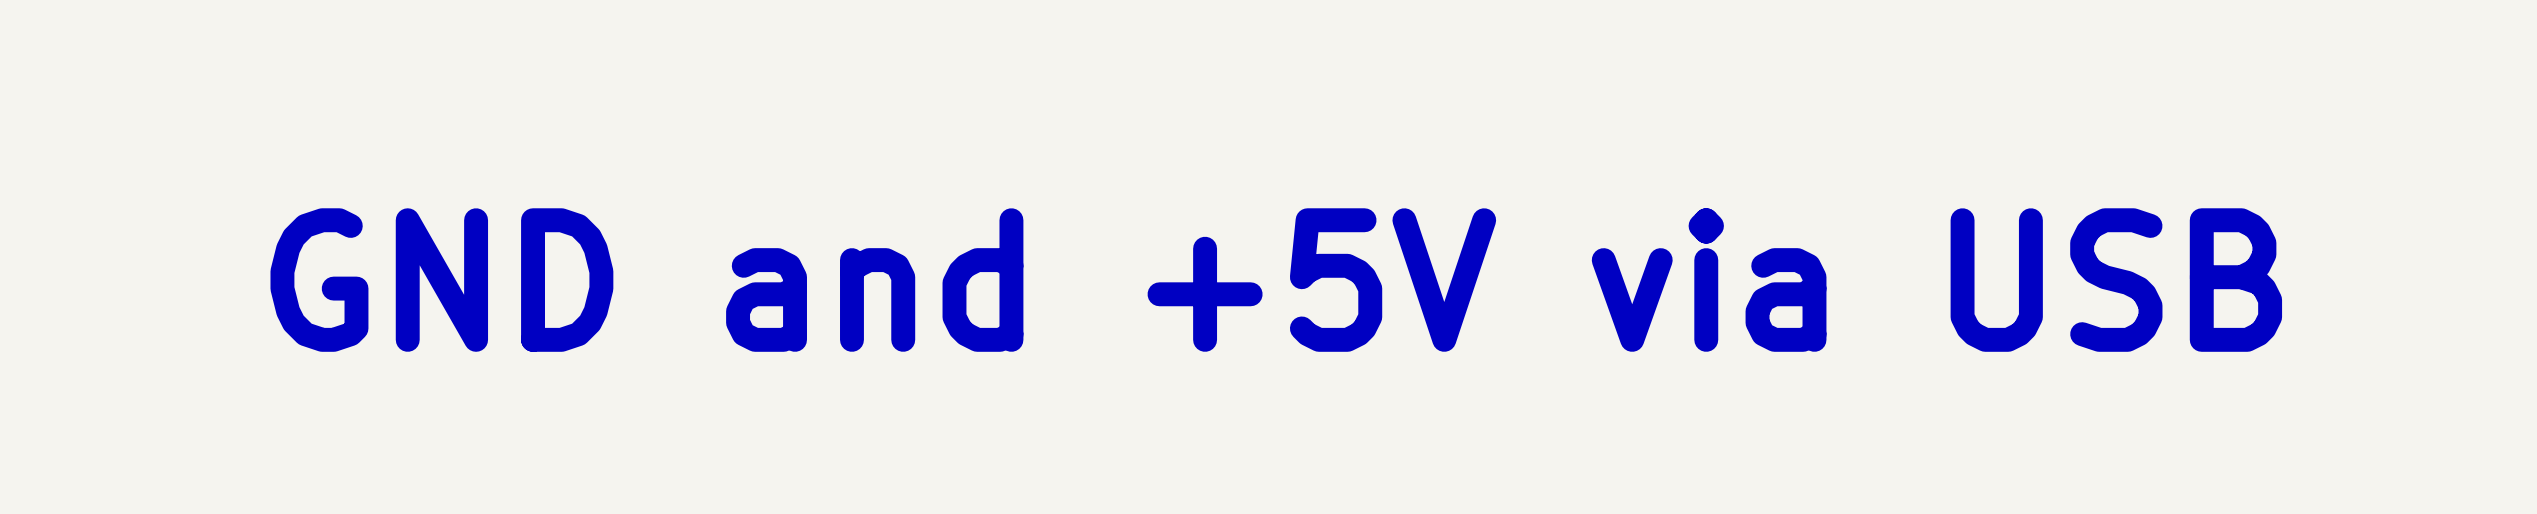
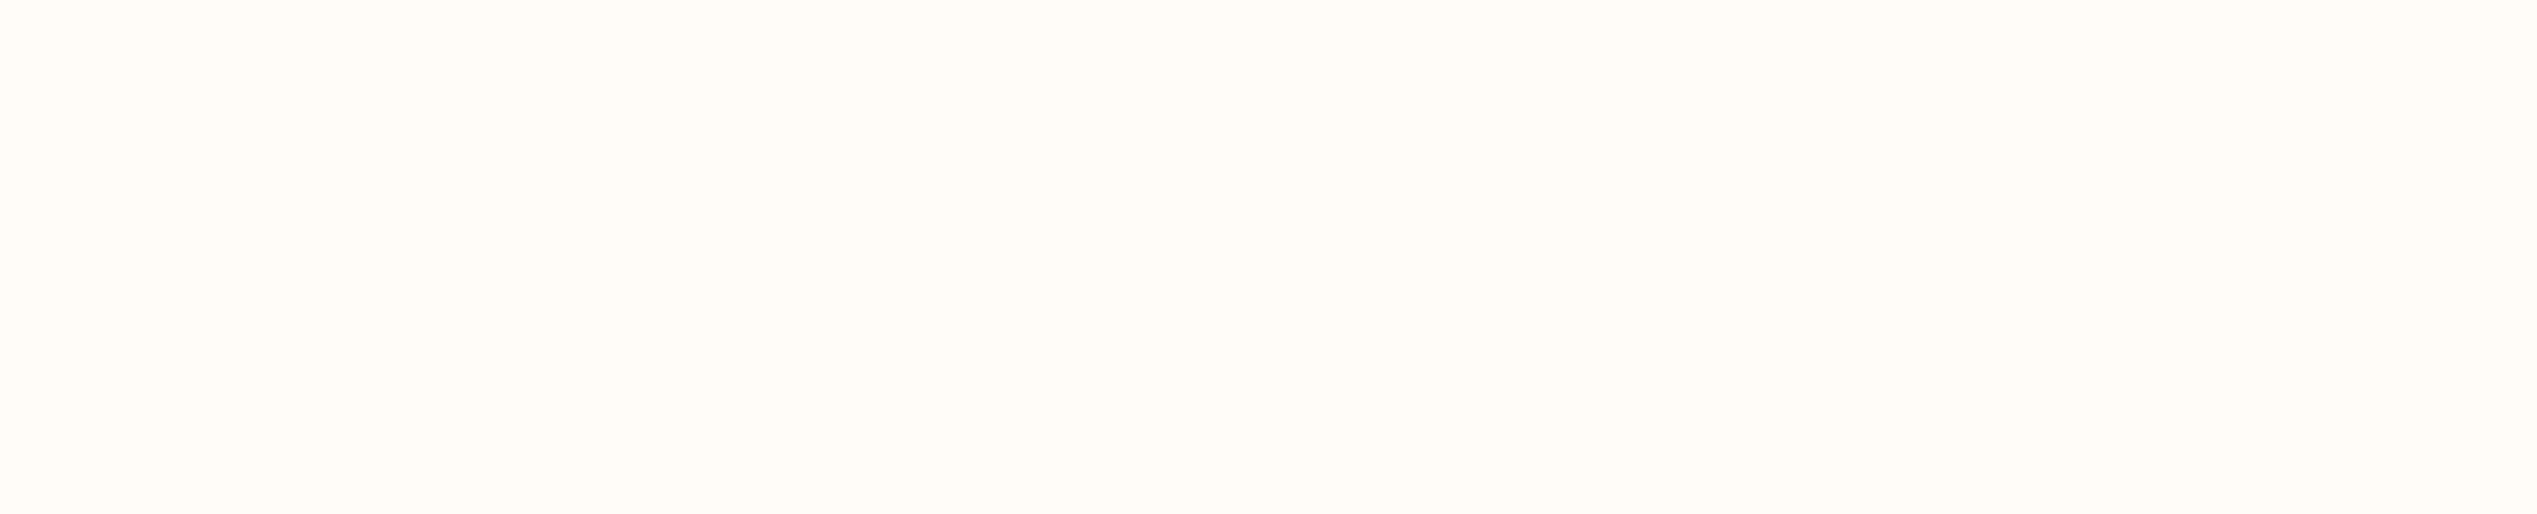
text: GND and +5V via USB (1276, 280) -> none

